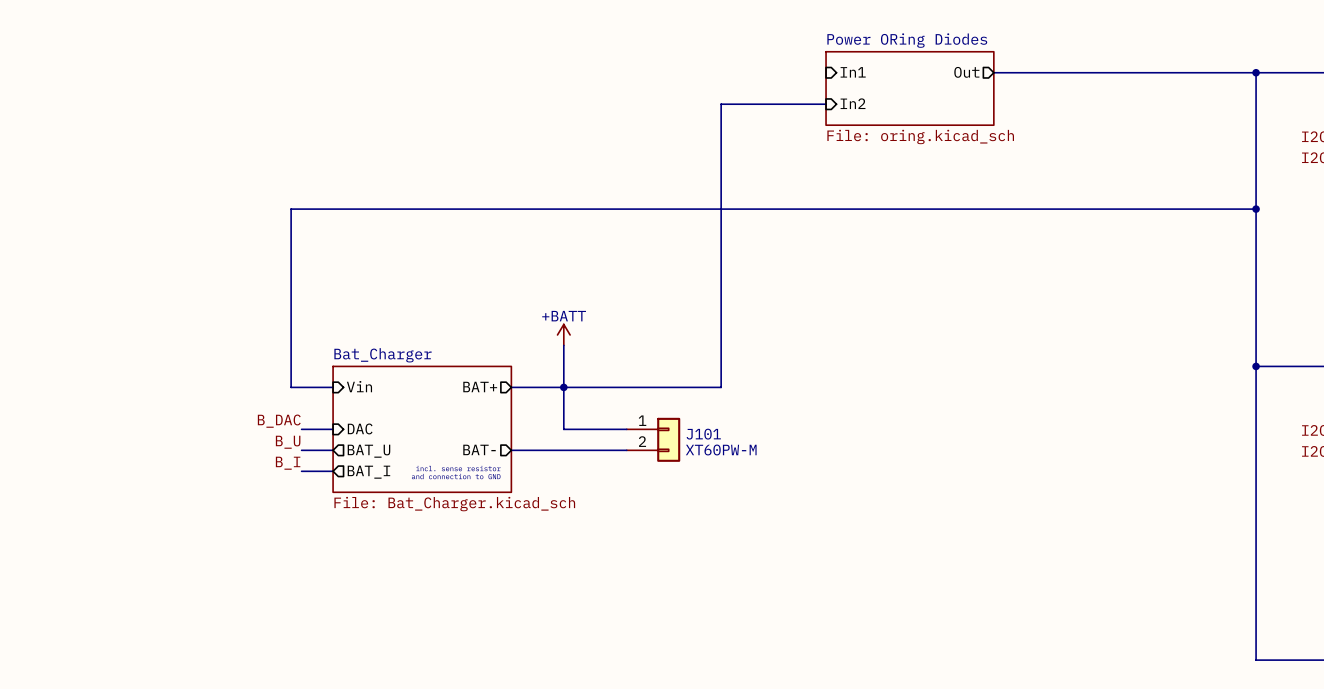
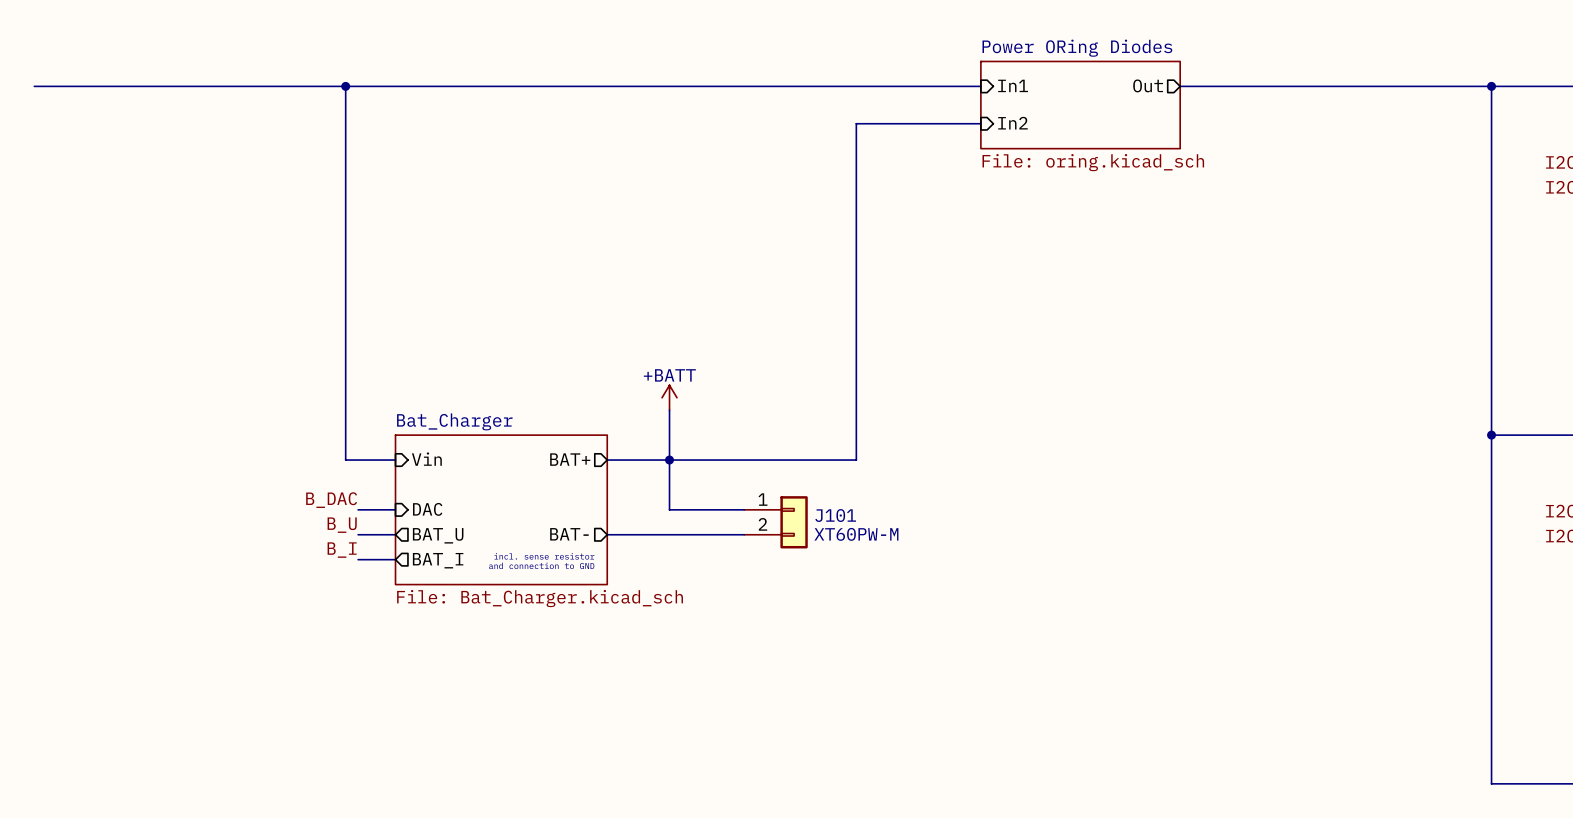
wire: none -> (34, 86) (980, 86)
junction: none -> (345, 86)
wire: (291, 209) (1256, 209) -> (345, 248) (345, 86)
junction: (1256, 209) -> none

